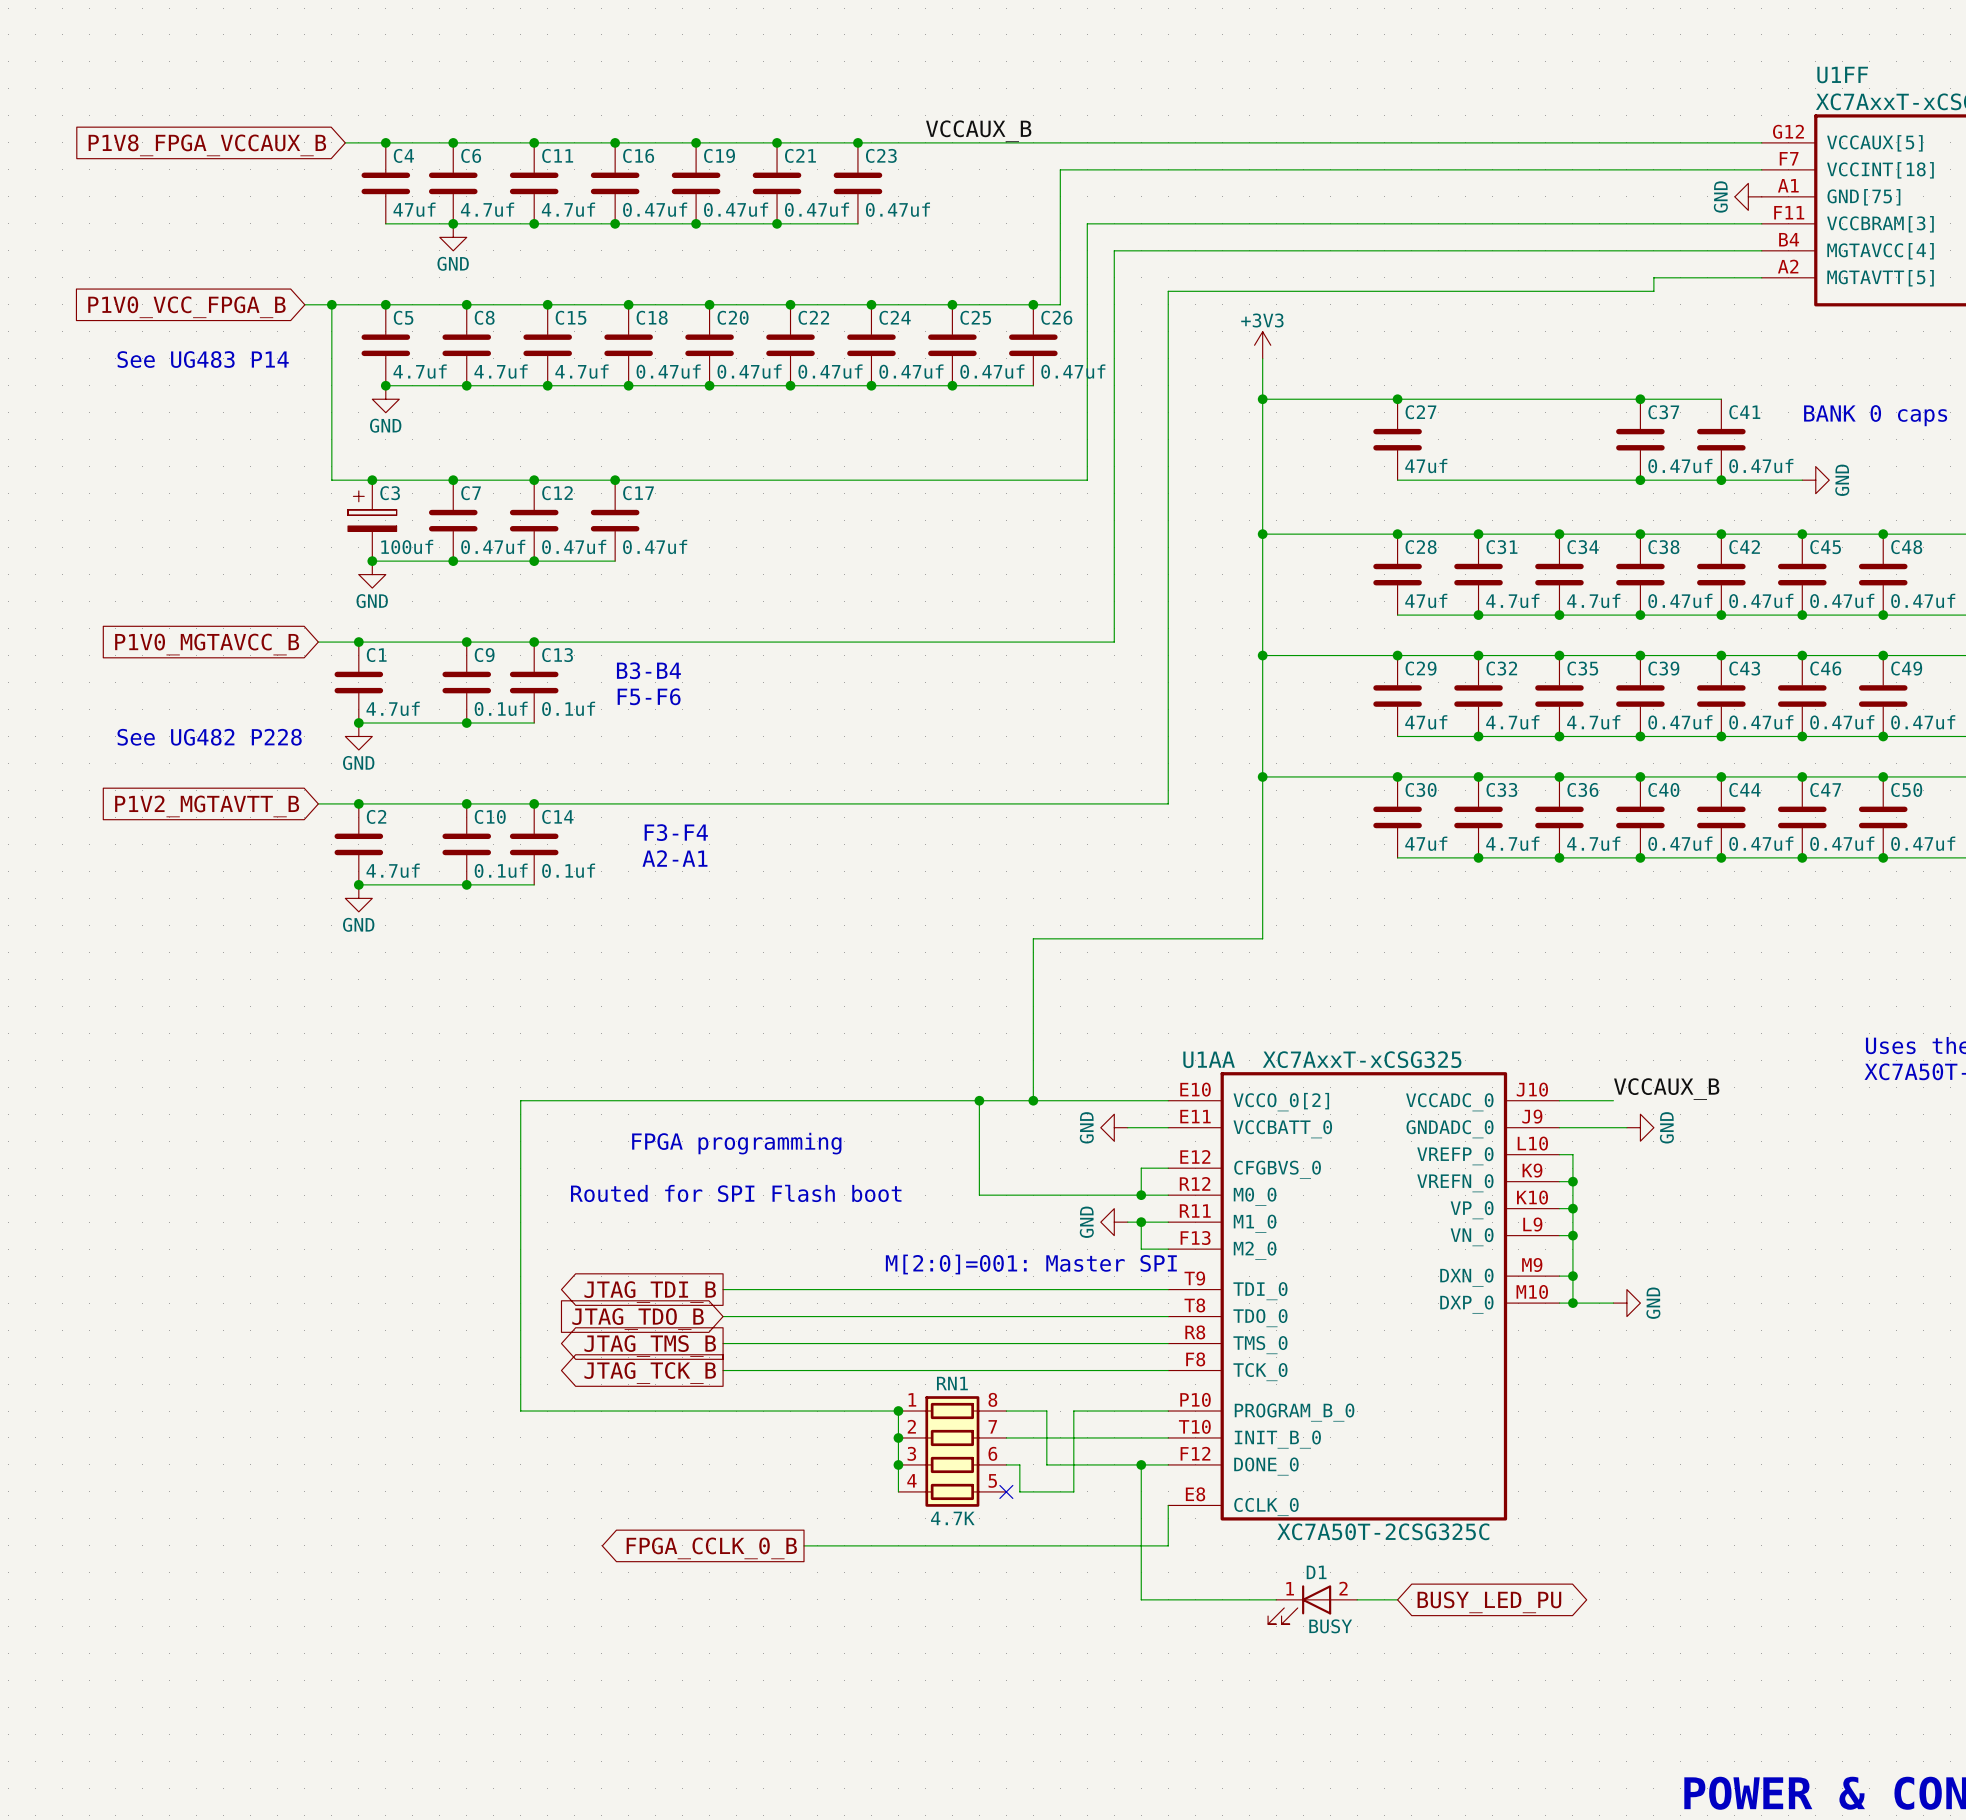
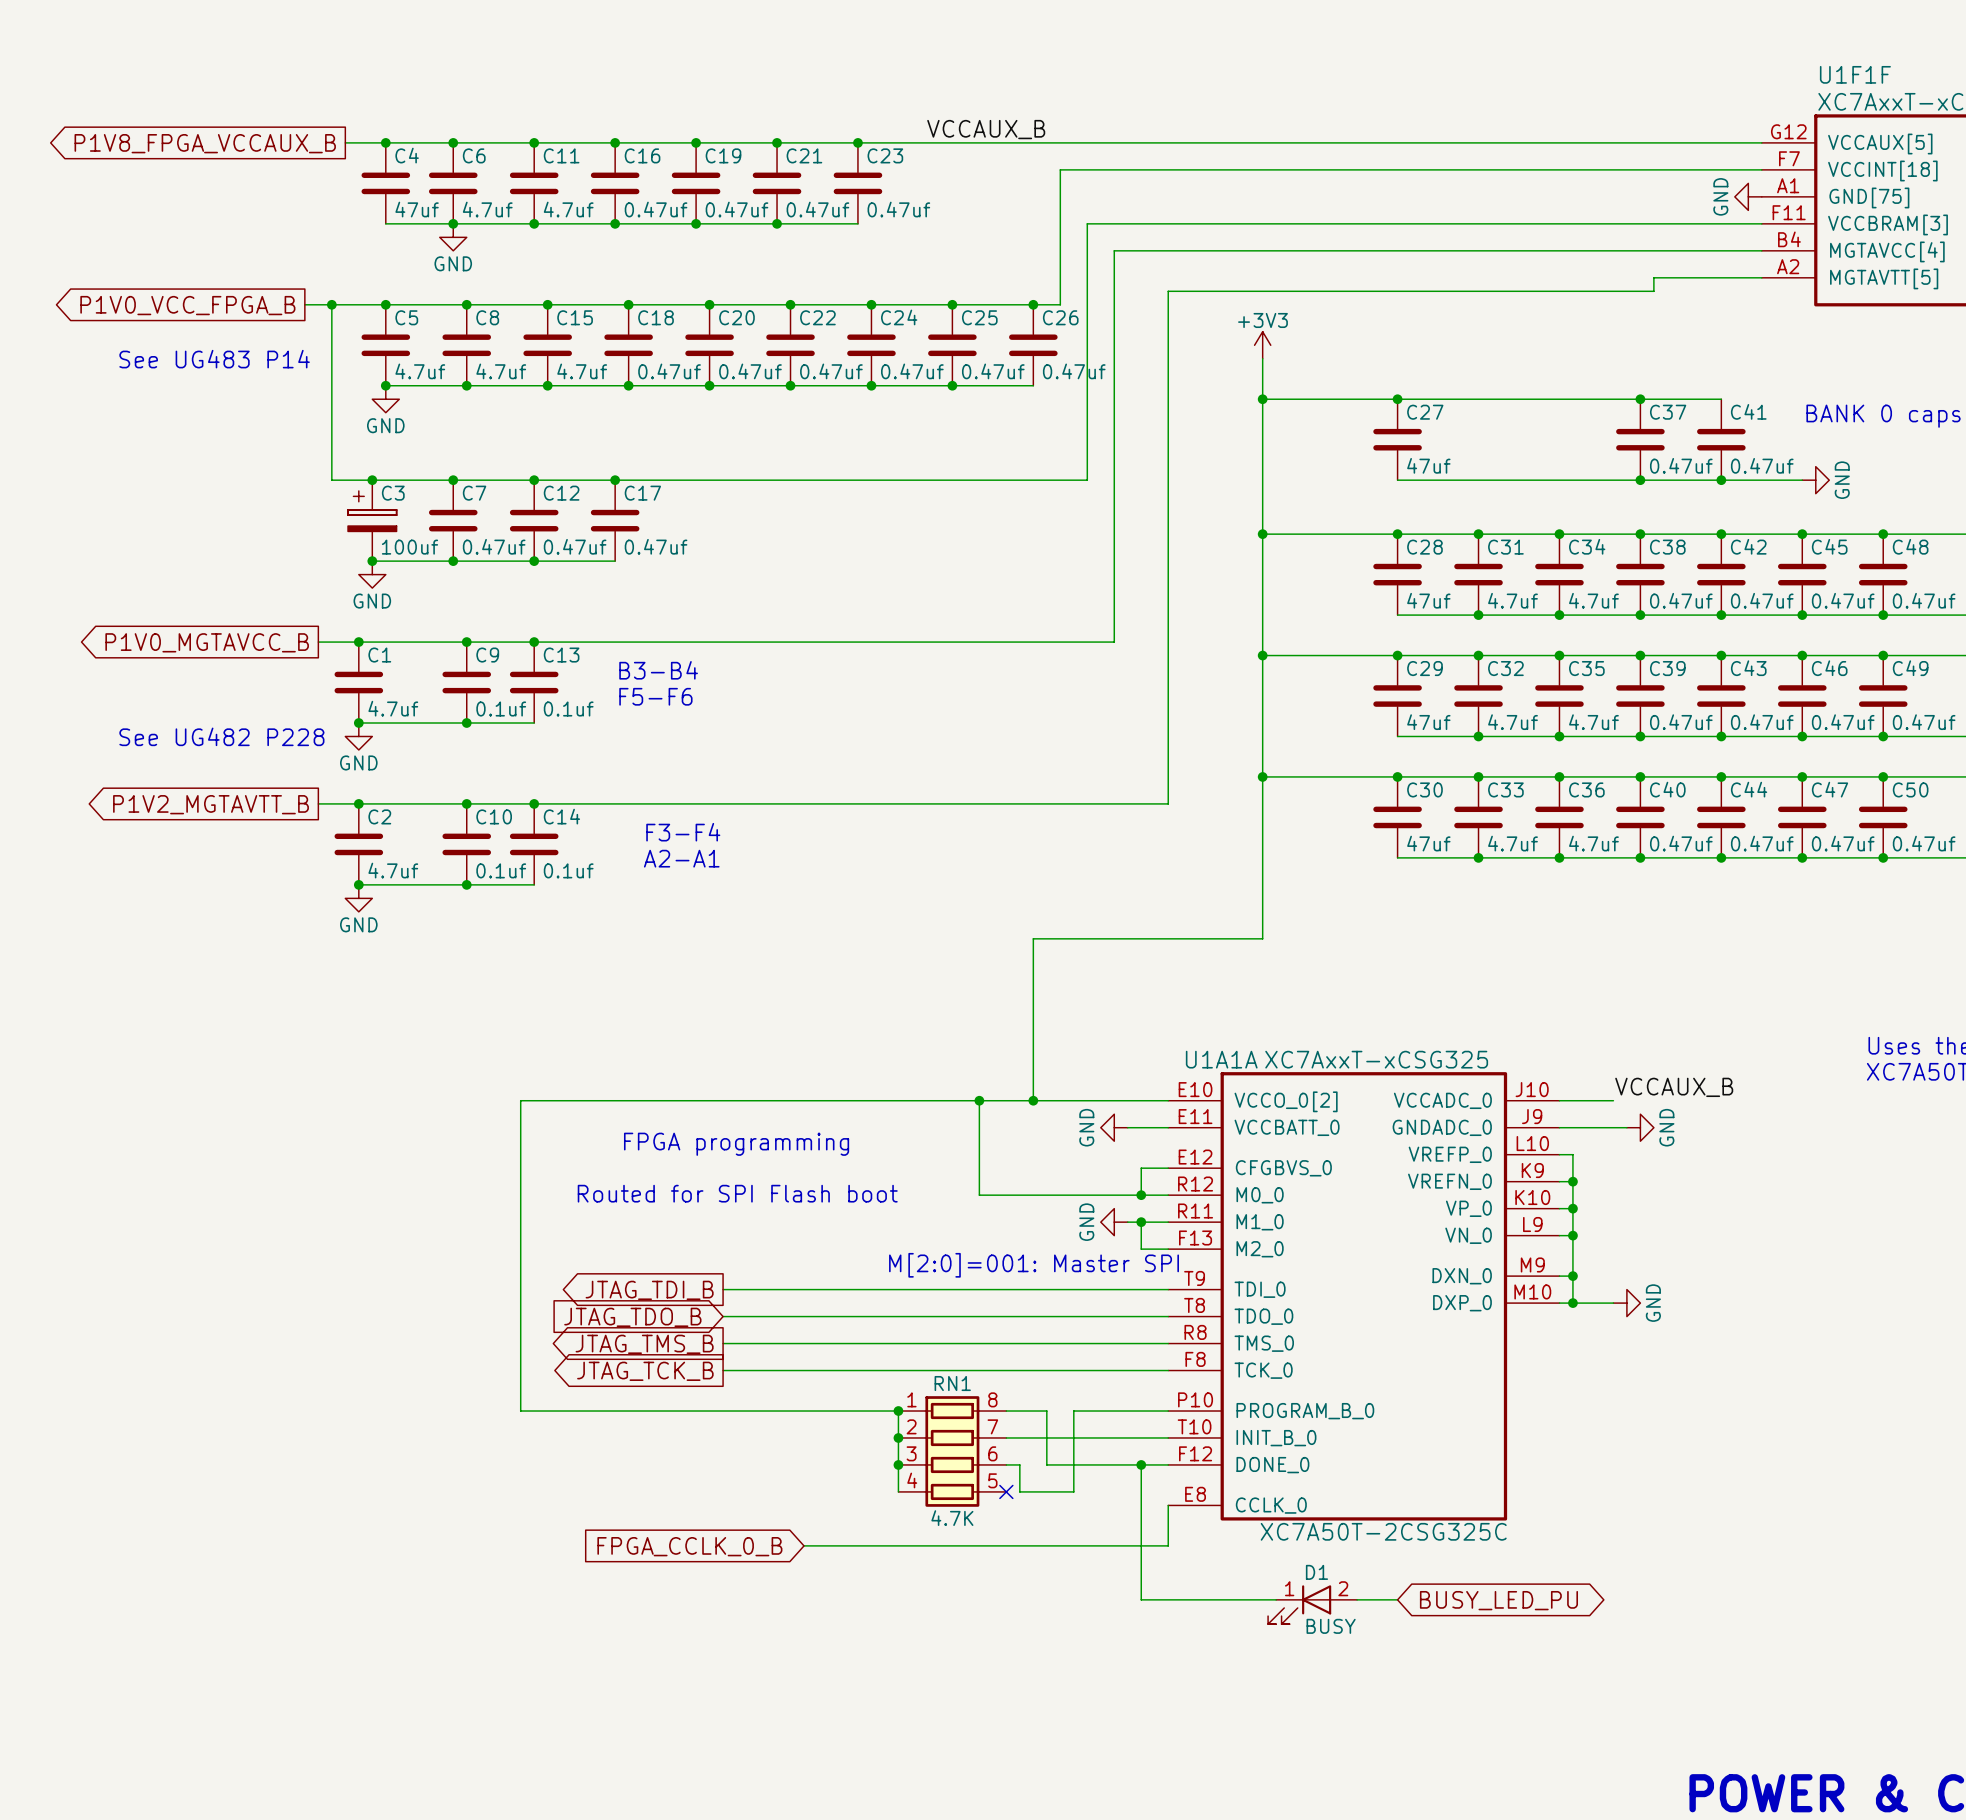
U1FF name: U1FF (1842, 75) -> U1F1F (1855, 74)
global label shape: input (207, 145) -> output (205, 143)
global label shape: input (186, 307) -> output (187, 305)
global label shape: input (207, 644) -> output (207, 642)
global label shape: input (207, 806) -> output (211, 804)
U1AA name: U1AA (1209, 1059) -> U1A1A (1221, 1059)
global label shape: output (711, 1548) -> input (689, 1546)

